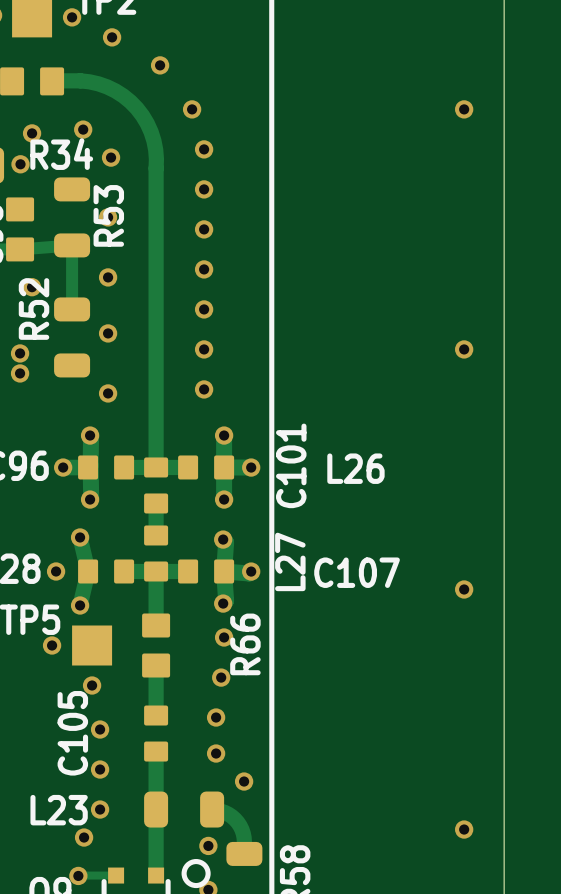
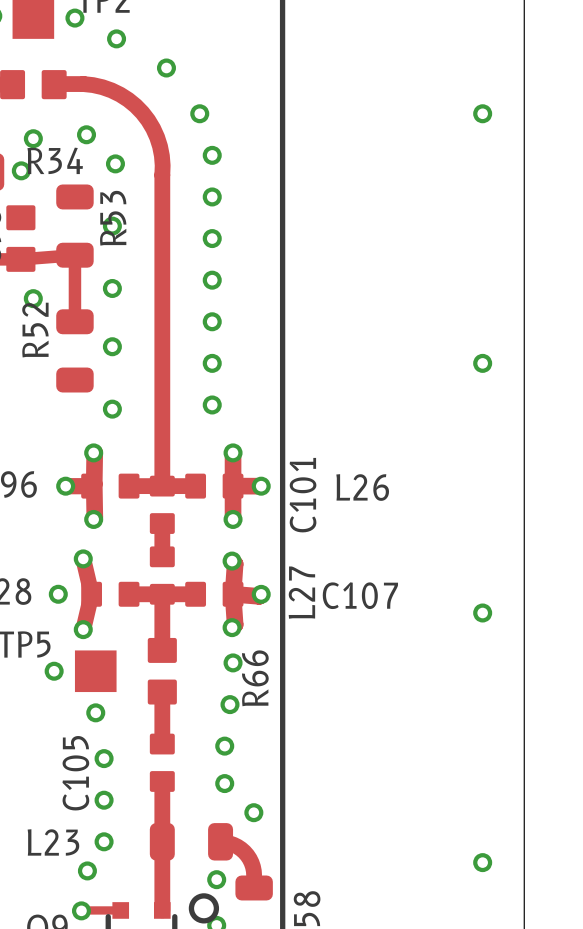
via: (20, 353) -> none
via: (20, 373) -> none

